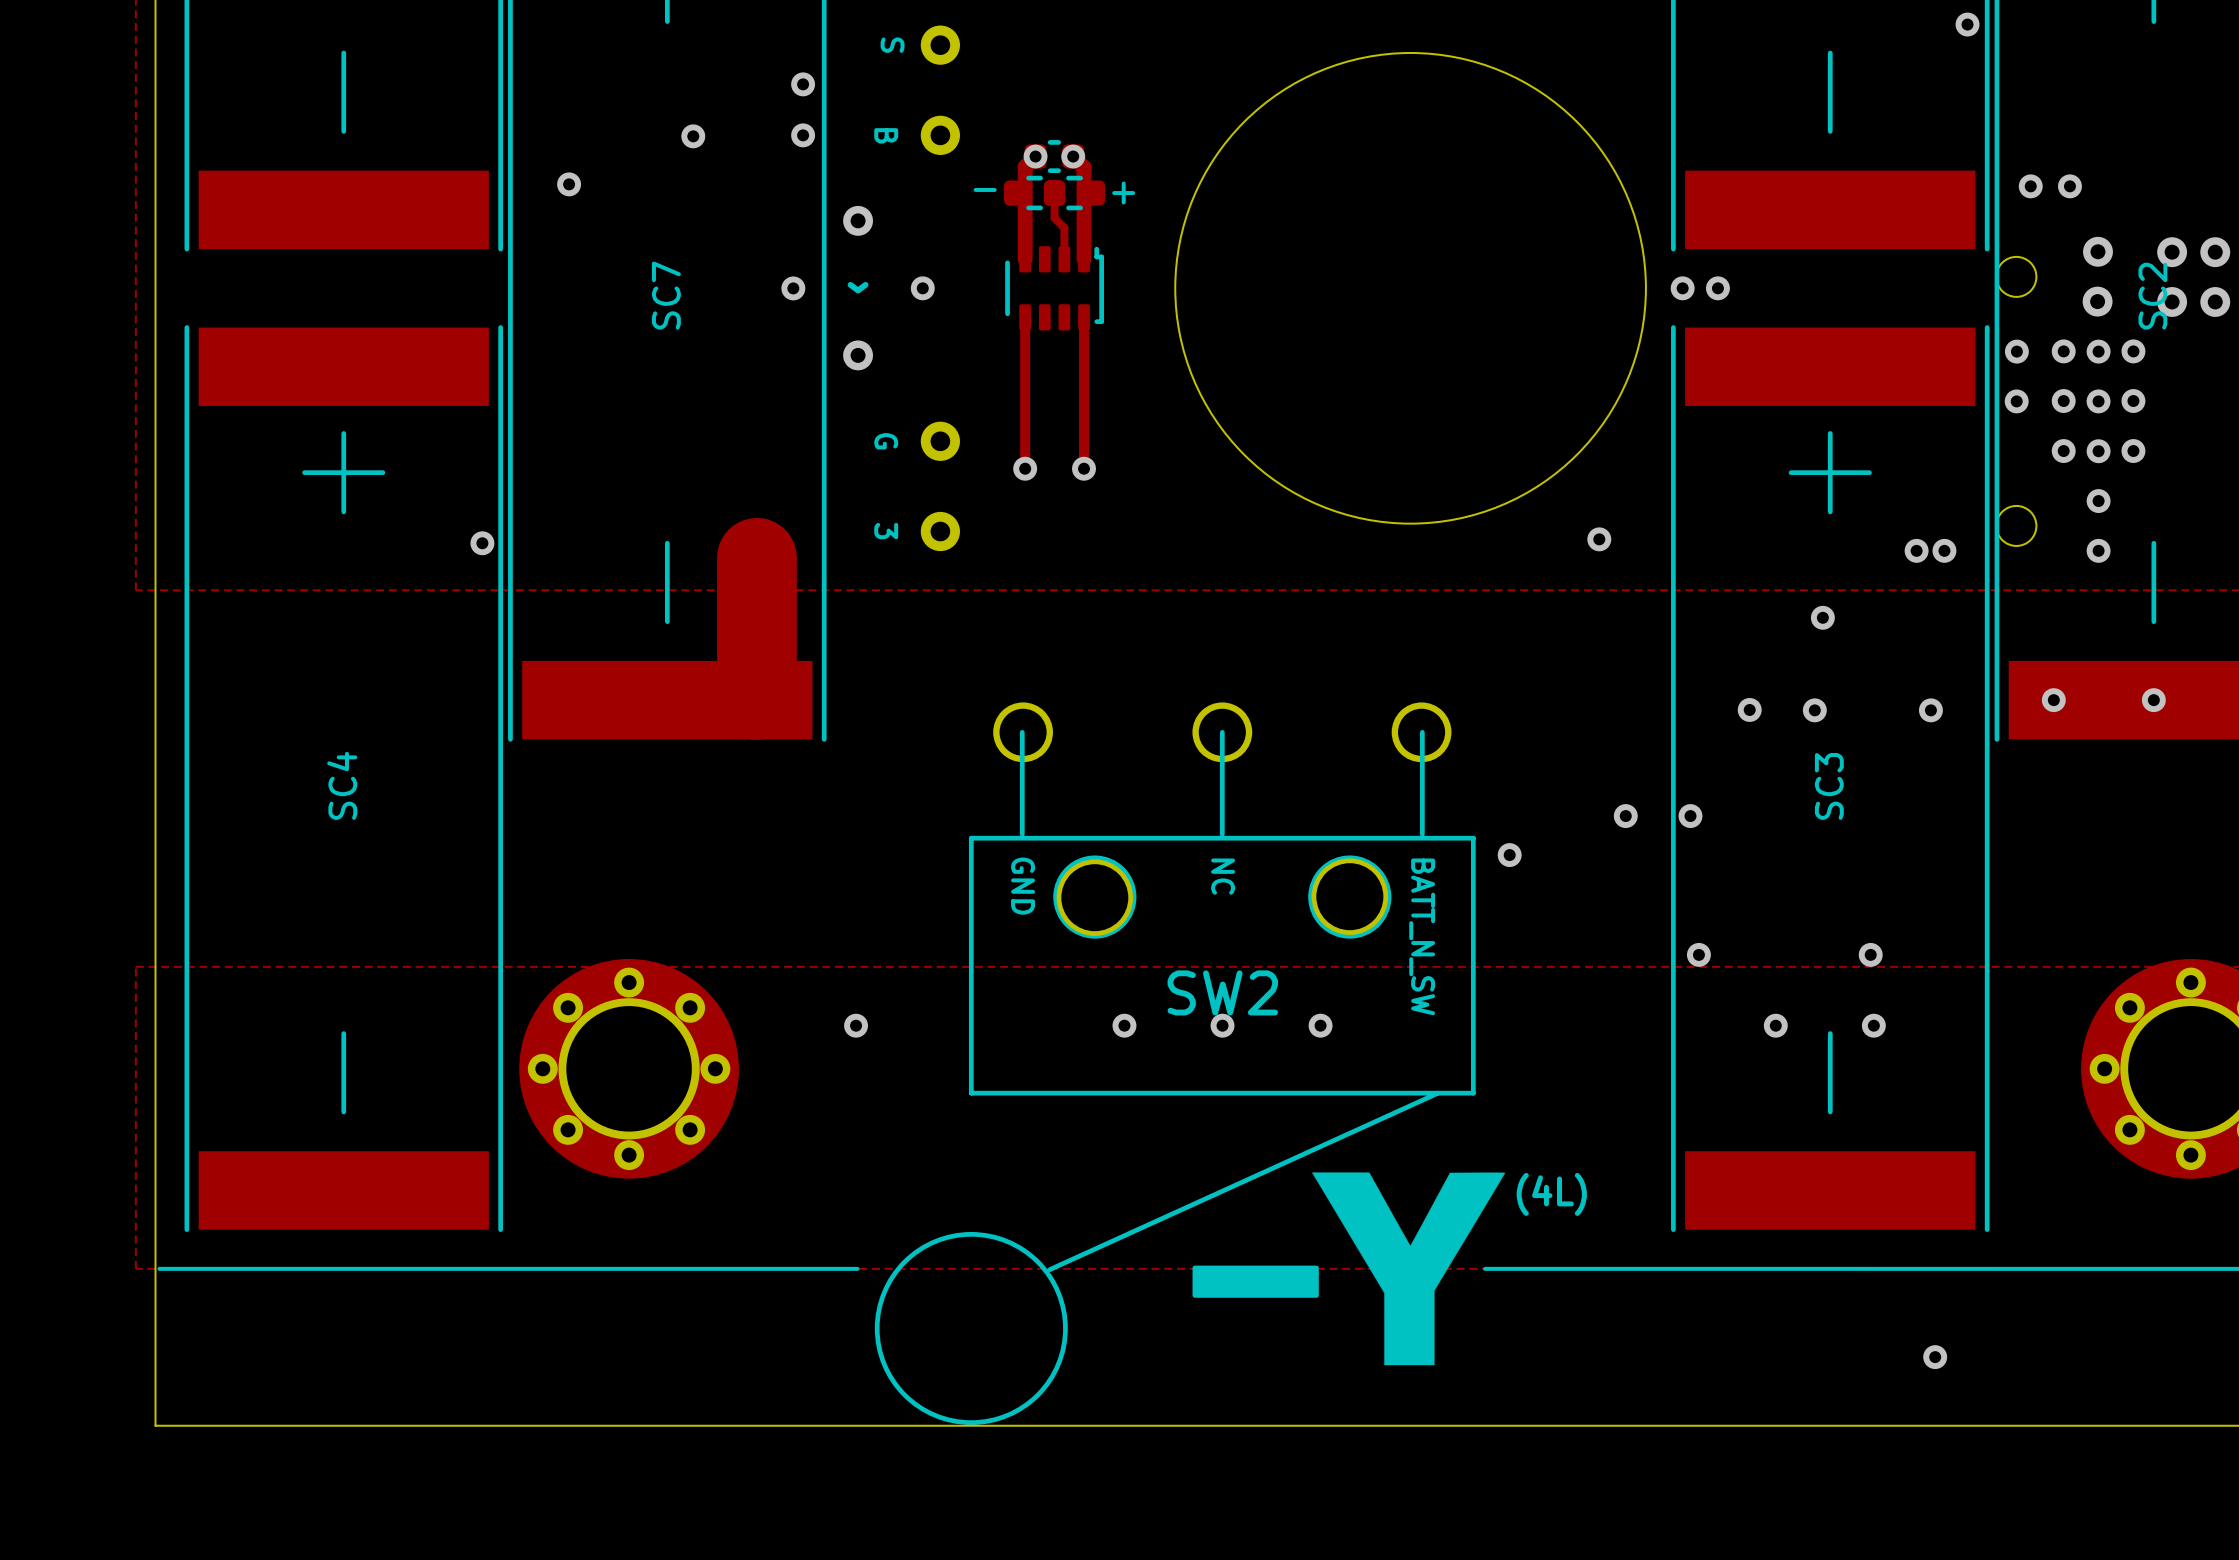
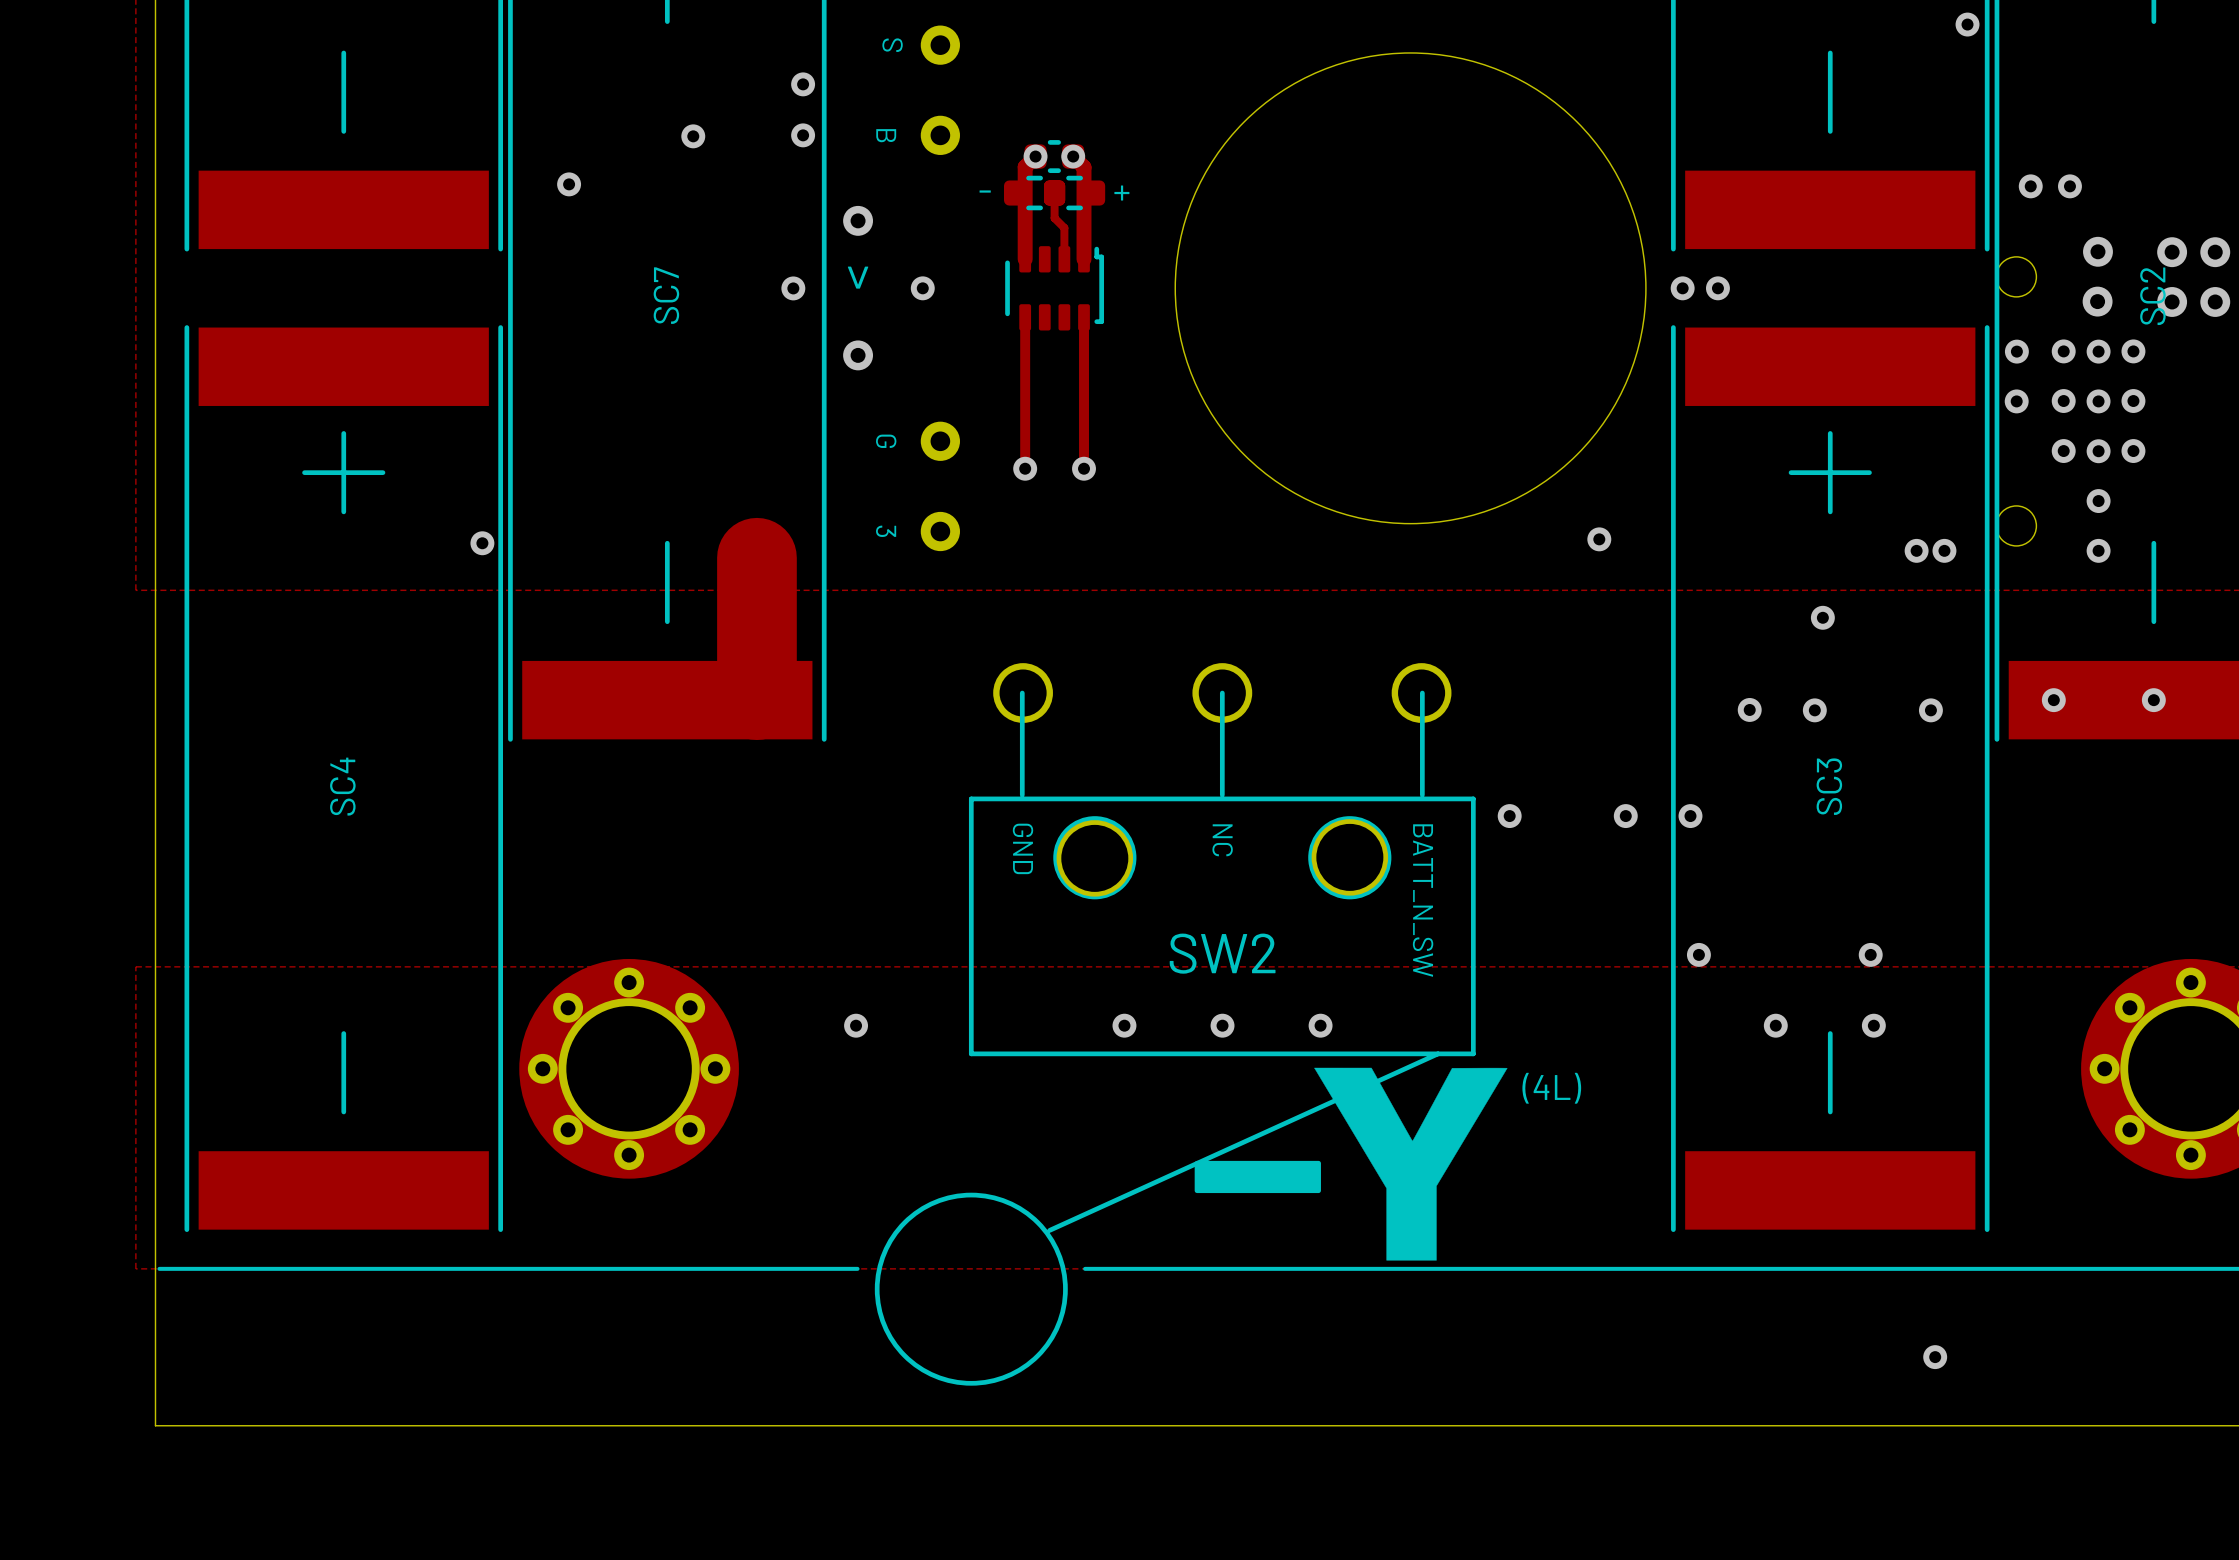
via position: (1509, 855) -> (1509, 816)
text position: NC (1223, 876) -> NC (1222, 840)
text position: GND (1023, 886) -> GND (1023, 848)
text position: BATT_N_SW (1422, 936) -> BATT_N_SW (1423, 900)
SW2 position: (1175, 1063) -> (1175, 1024)
text position: (4L) (1551, 1194) -> (4L) (1551, 1088)
line: none -> (1085, 1268) (1485, 1268)
drawing position: (1348, 1268) -> (1351, 1164)

